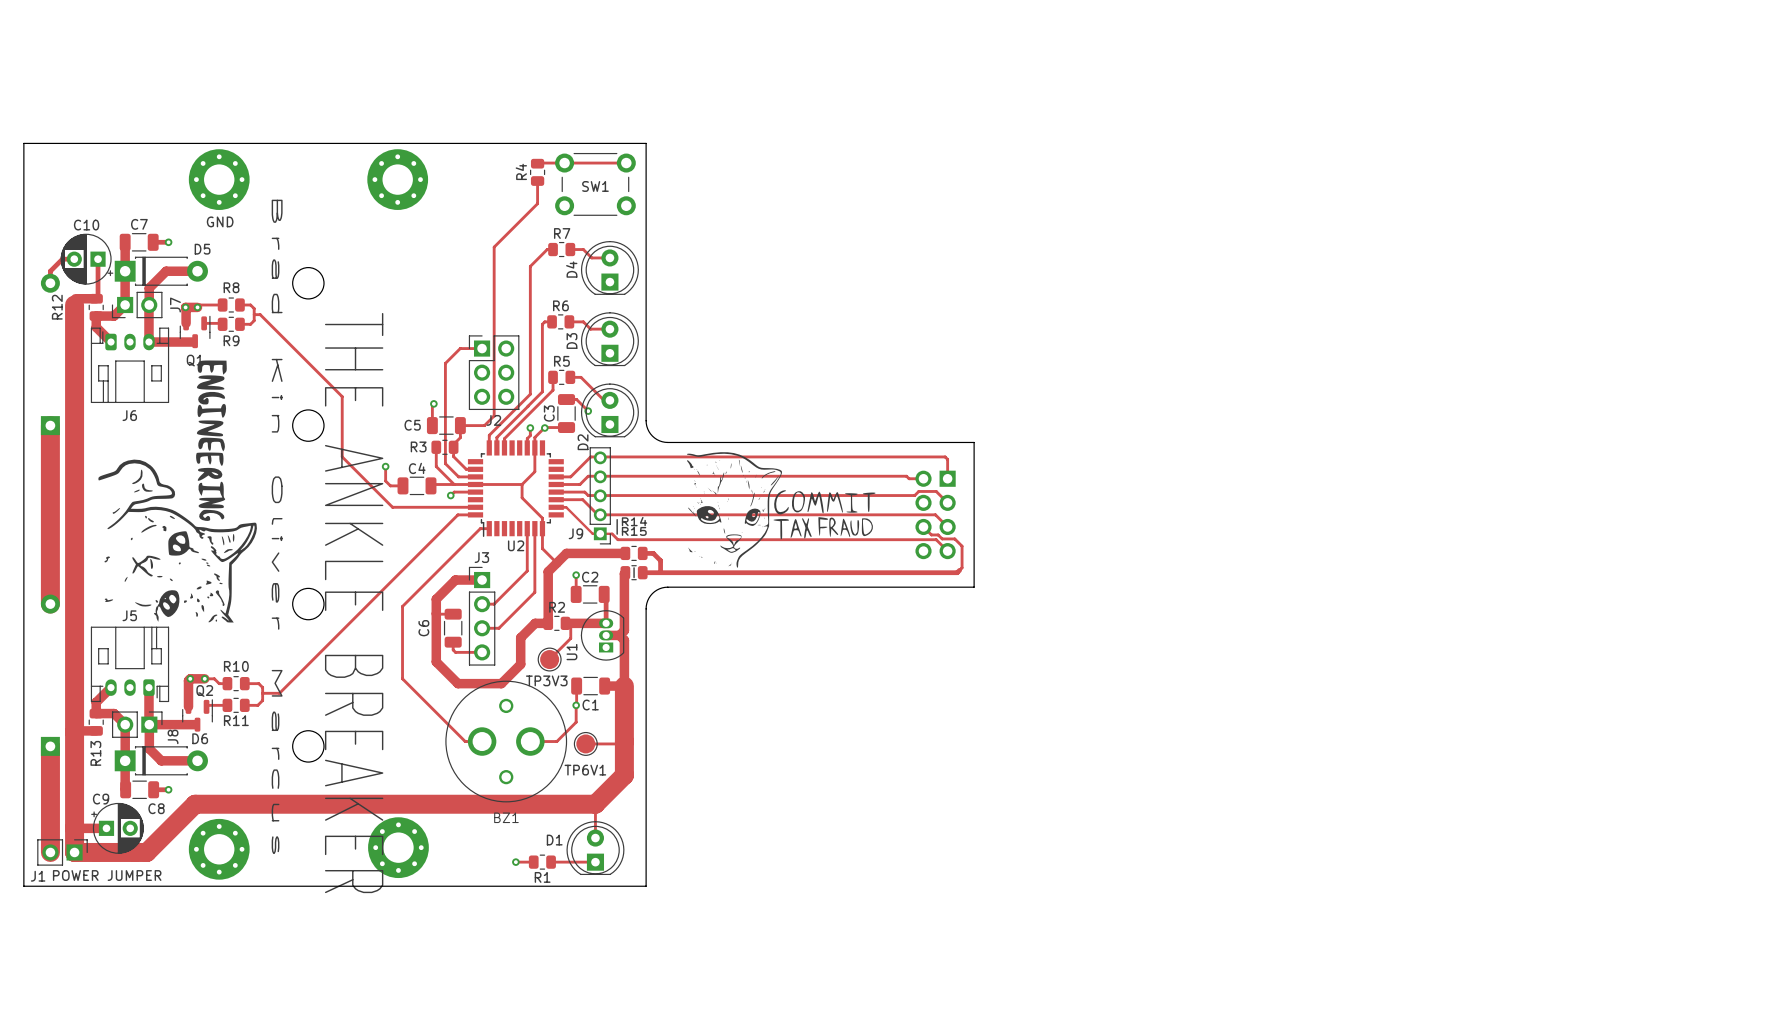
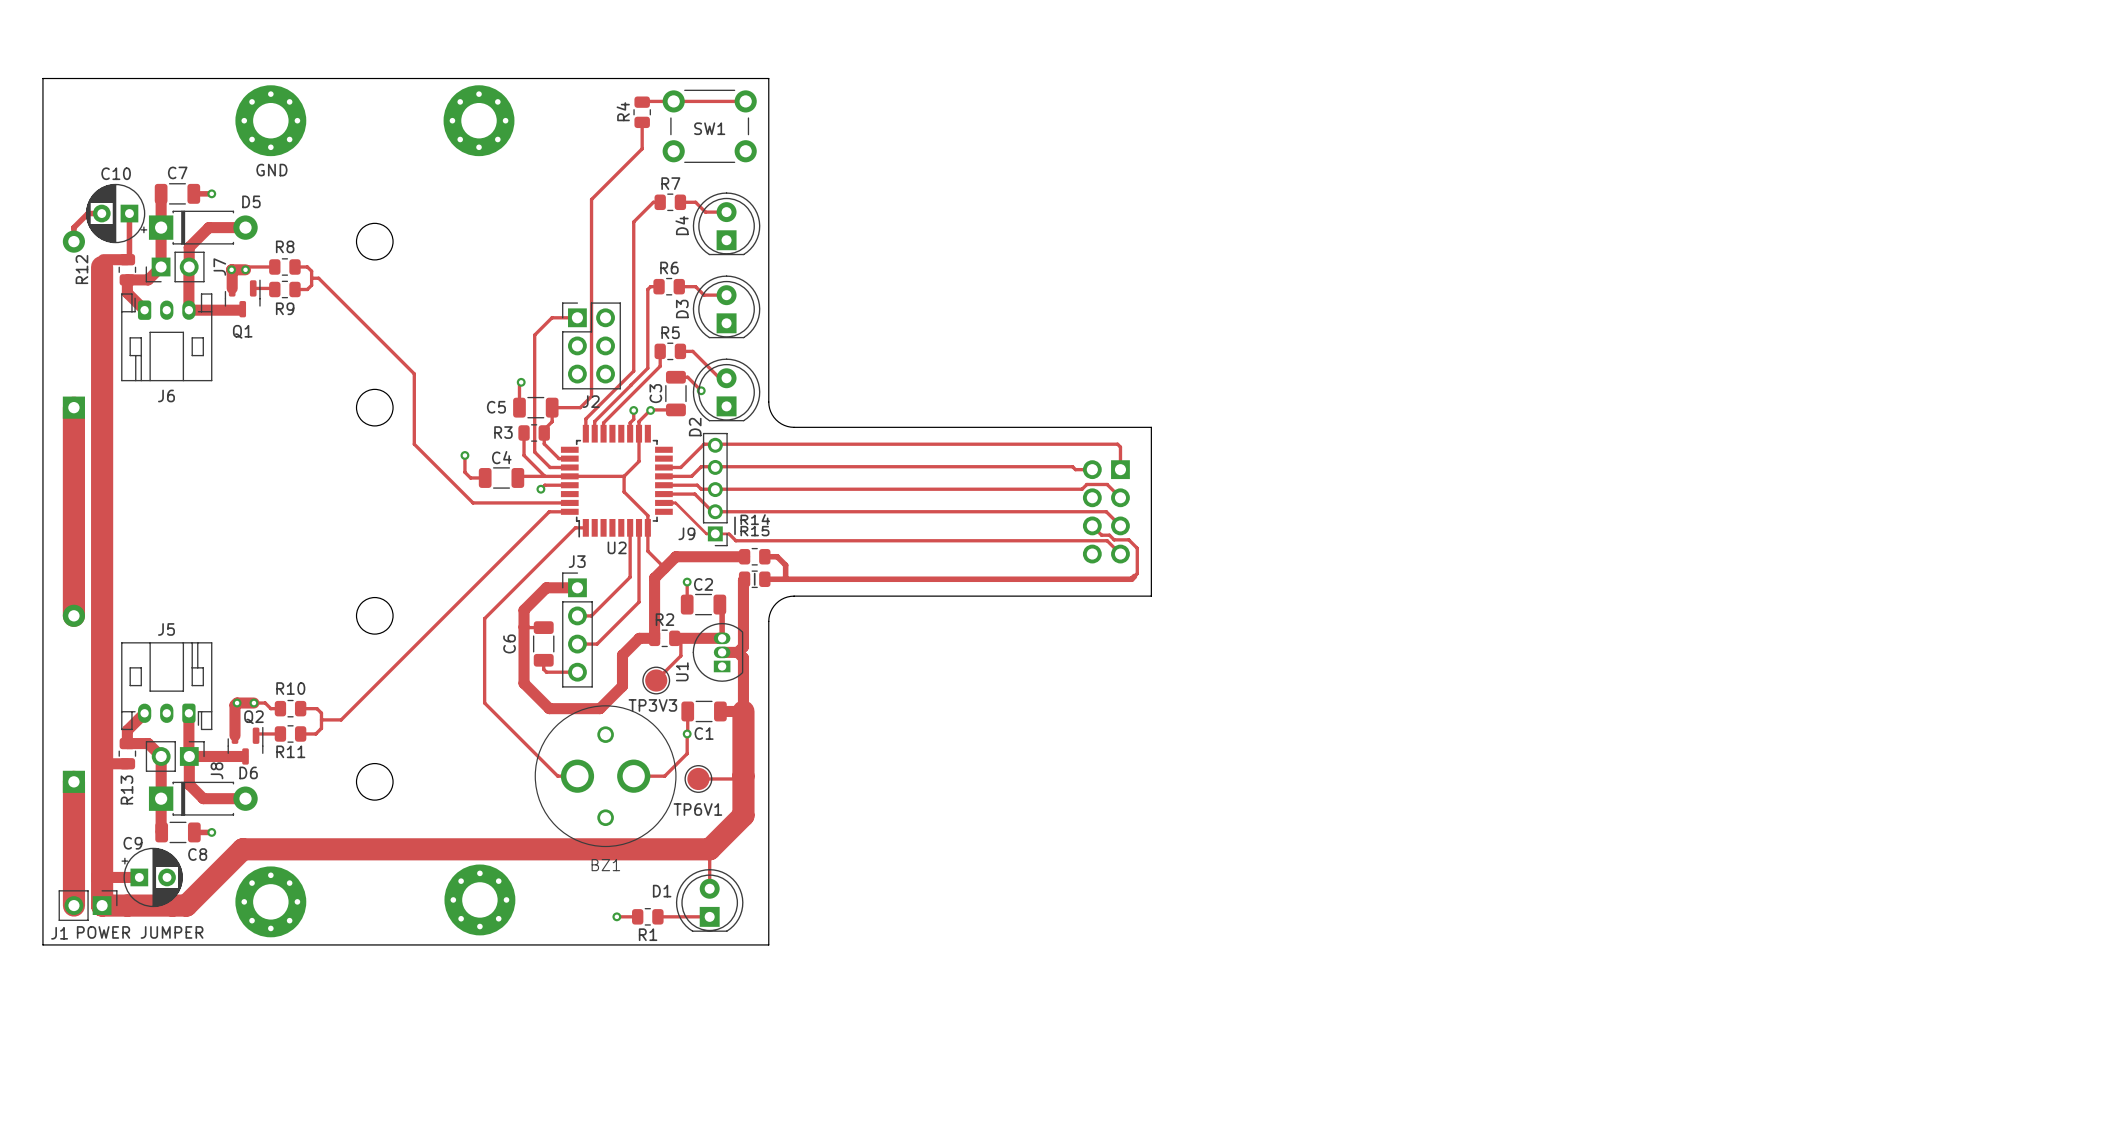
drawing: [98, 360, 257, 623] -> none
drawing: [686, 452, 876, 568] -> none
text: Brad Kin Oliver Marcus (277, 526) -> none
text: THE ANKLE BREAKER (354, 603) -> none

